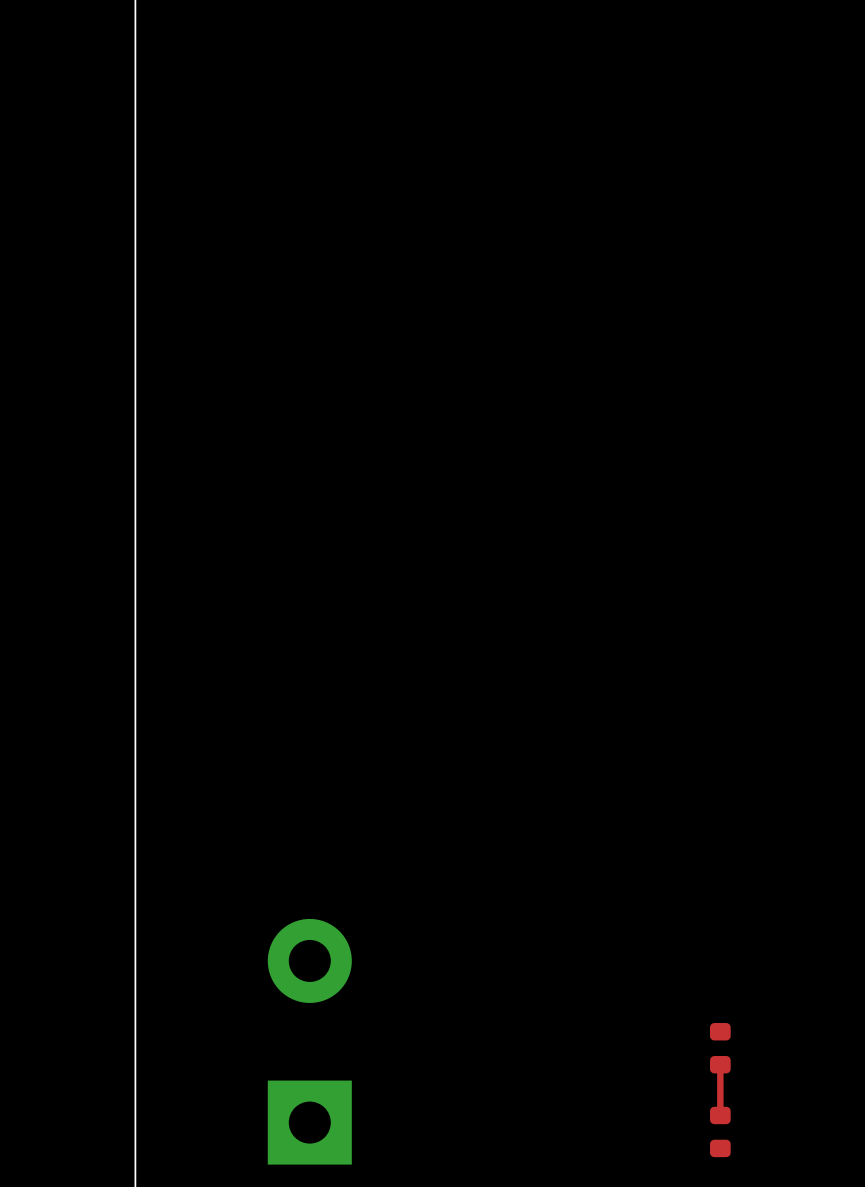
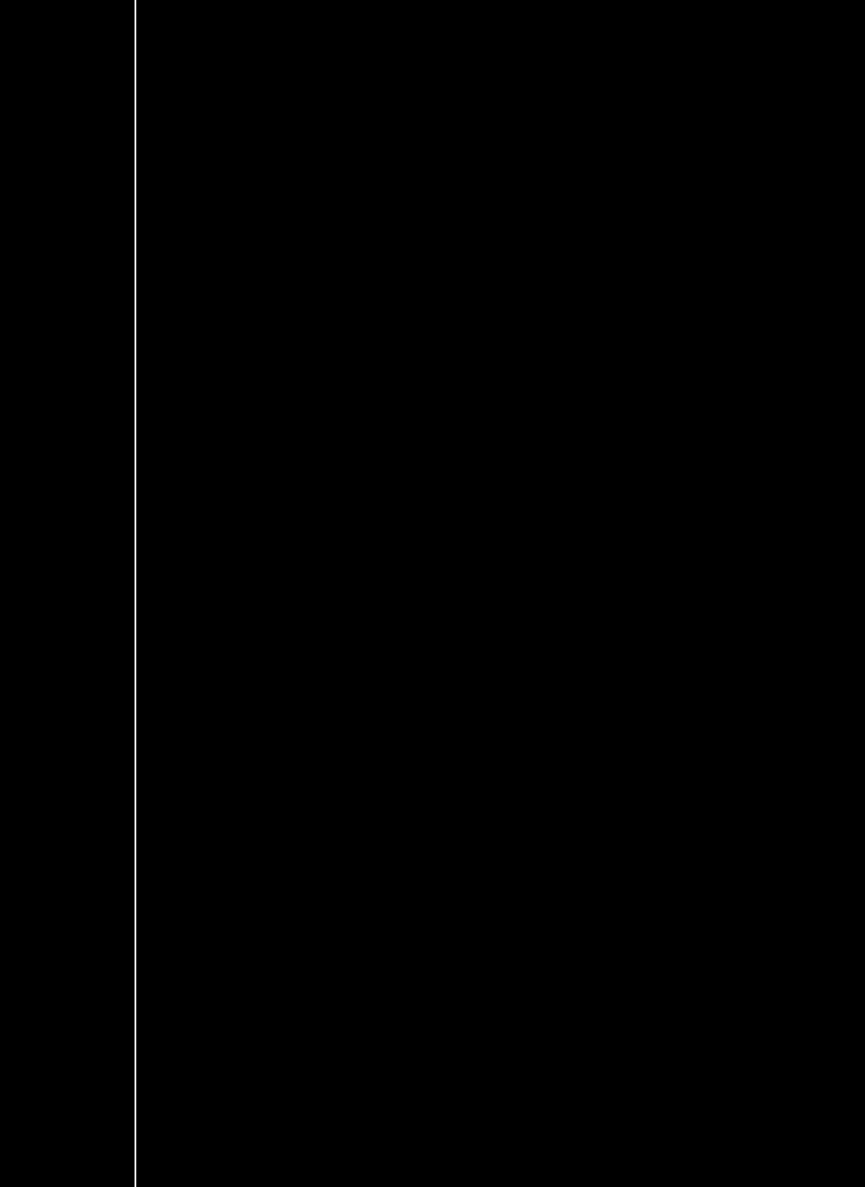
part: (309, 1041) -> none
part: (720, 1048) -> none
top track: (720, 1064) (720, 1115) -> none
part: (720, 1131) -> none

